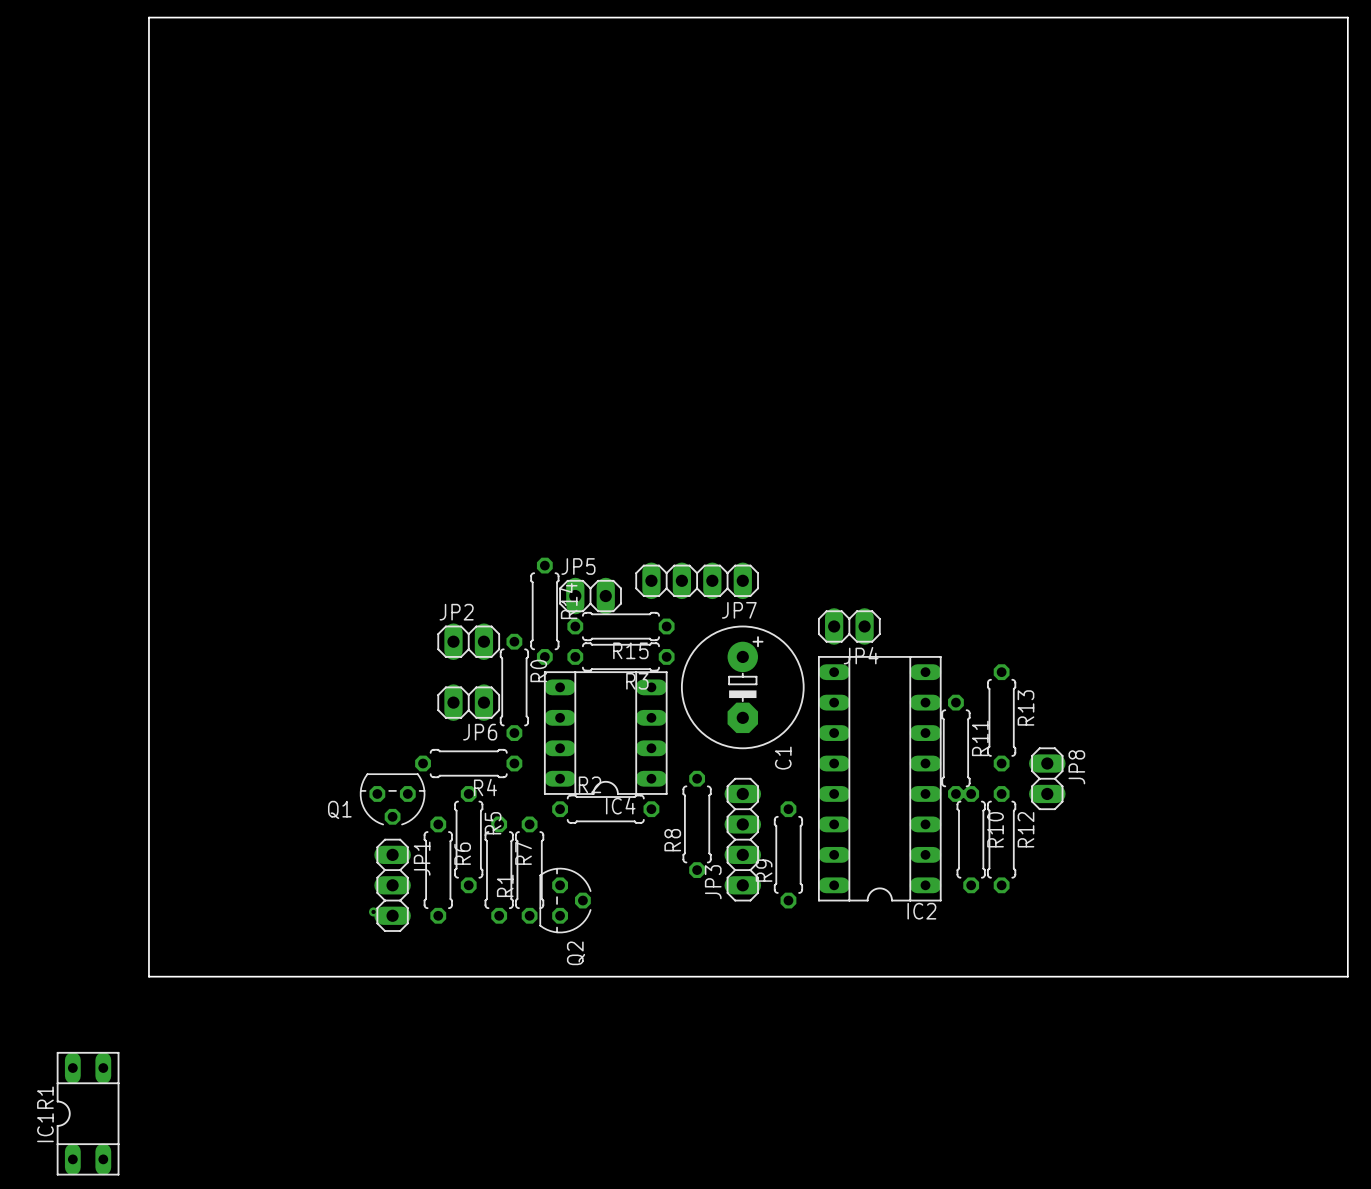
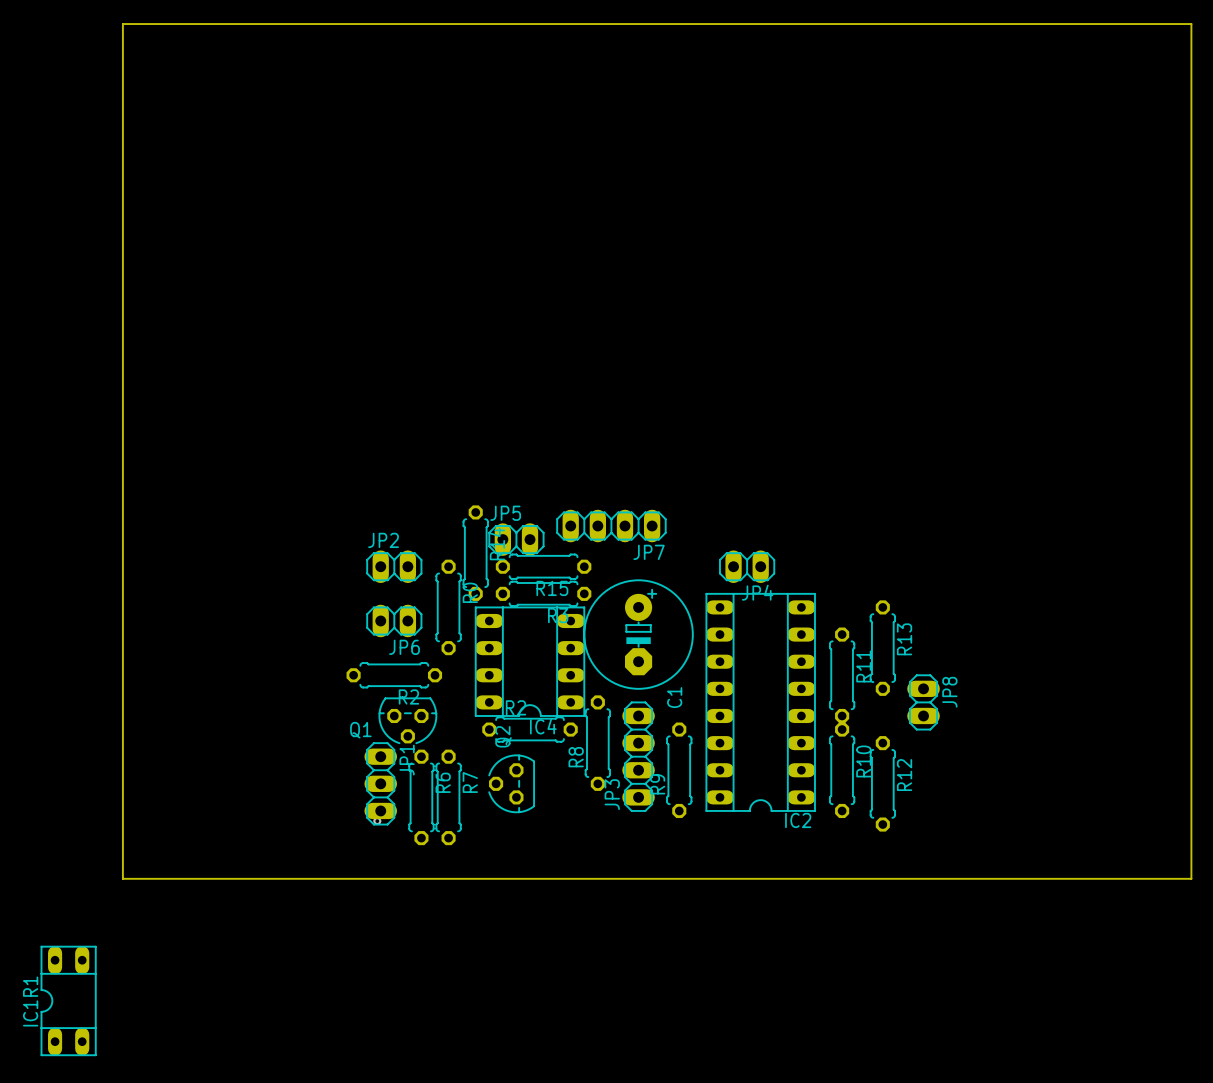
JP2 position: (468, 641) -> (394, 566)
R0 position: (514, 687) -> (448, 607)
C1 position: (742, 687) -> (638, 634)
JP6 position: (468, 702) -> (394, 620)
R2: none -> (394, 675)
R4: (468, 763) -> none
IC2 position: (879, 778) -> (760, 702)
Q1 position: (392, 799) -> (407, 720)
R8 position: (697, 824) -> (597, 743)
R5: (468, 839) -> none
JP3 position: (742, 839) -> (638, 756)
R10 position: (971, 839) -> (842, 770)
R12 position: (1001, 839) -> (882, 783)
R9 position: (788, 854) -> (679, 770)
R6 position: (438, 870) -> (421, 797)
R7 position: (499, 870) -> (448, 797)
R1: (529, 870) -> none
JP1 position: (392, 885) -> (380, 783)
Q2 rotation: 0° (565, 900) -> 180° (511, 783)
via position: (373, 911) -> (377, 821)

